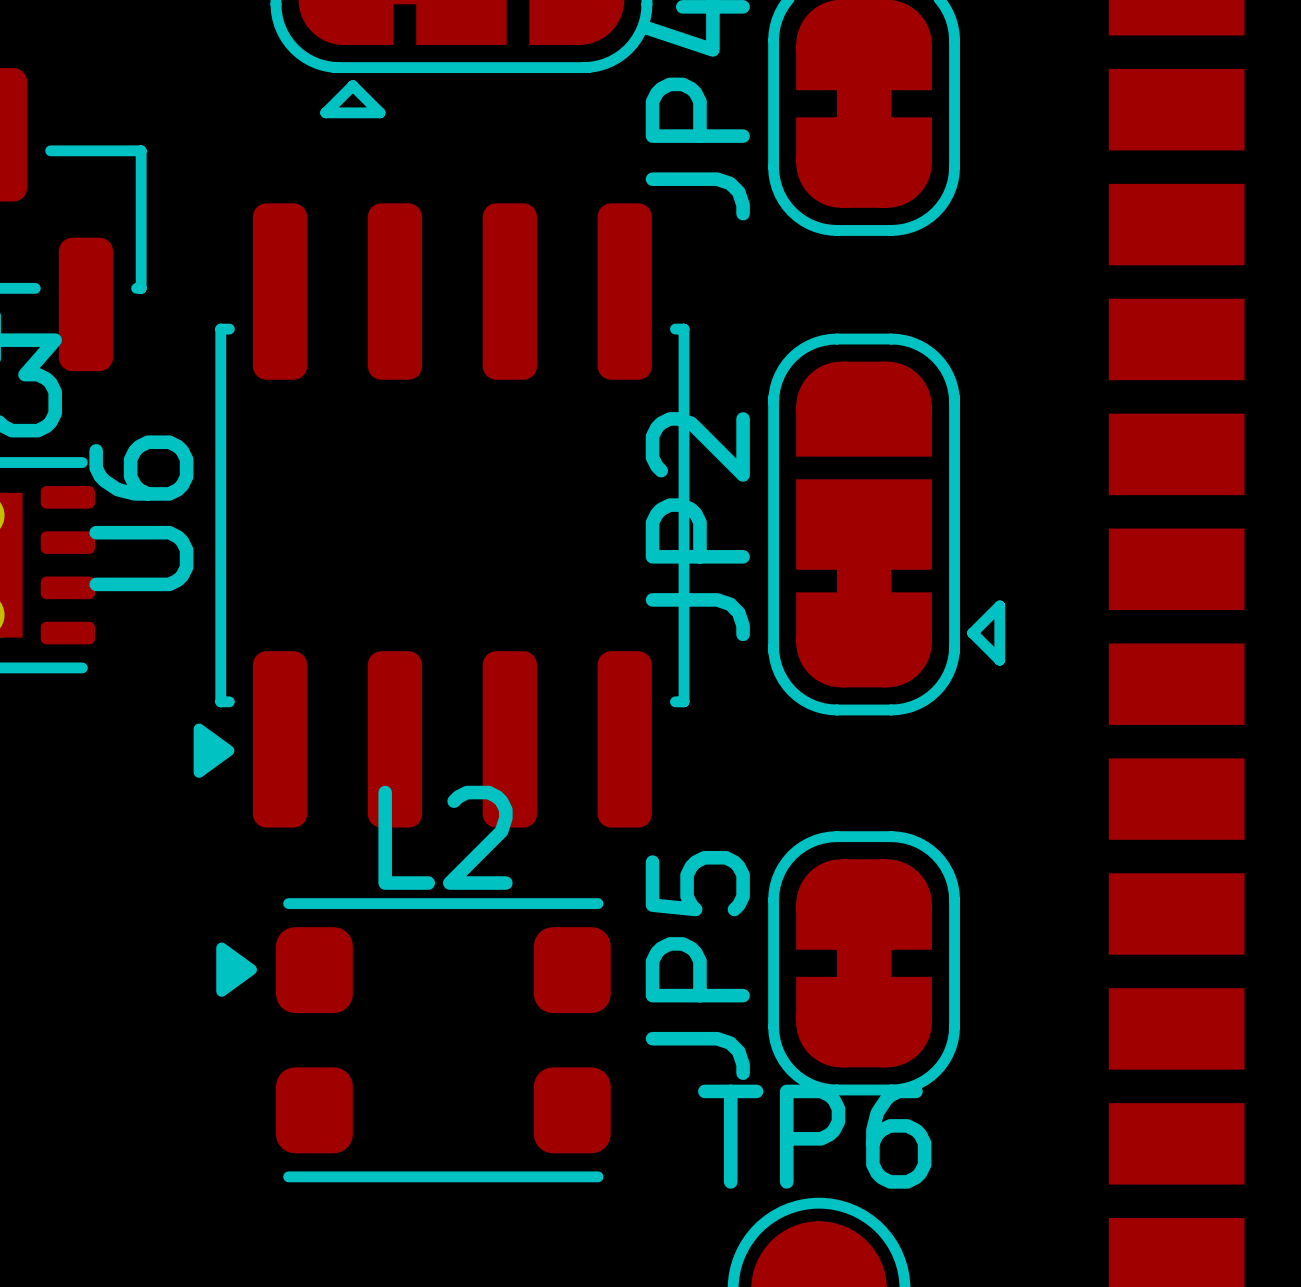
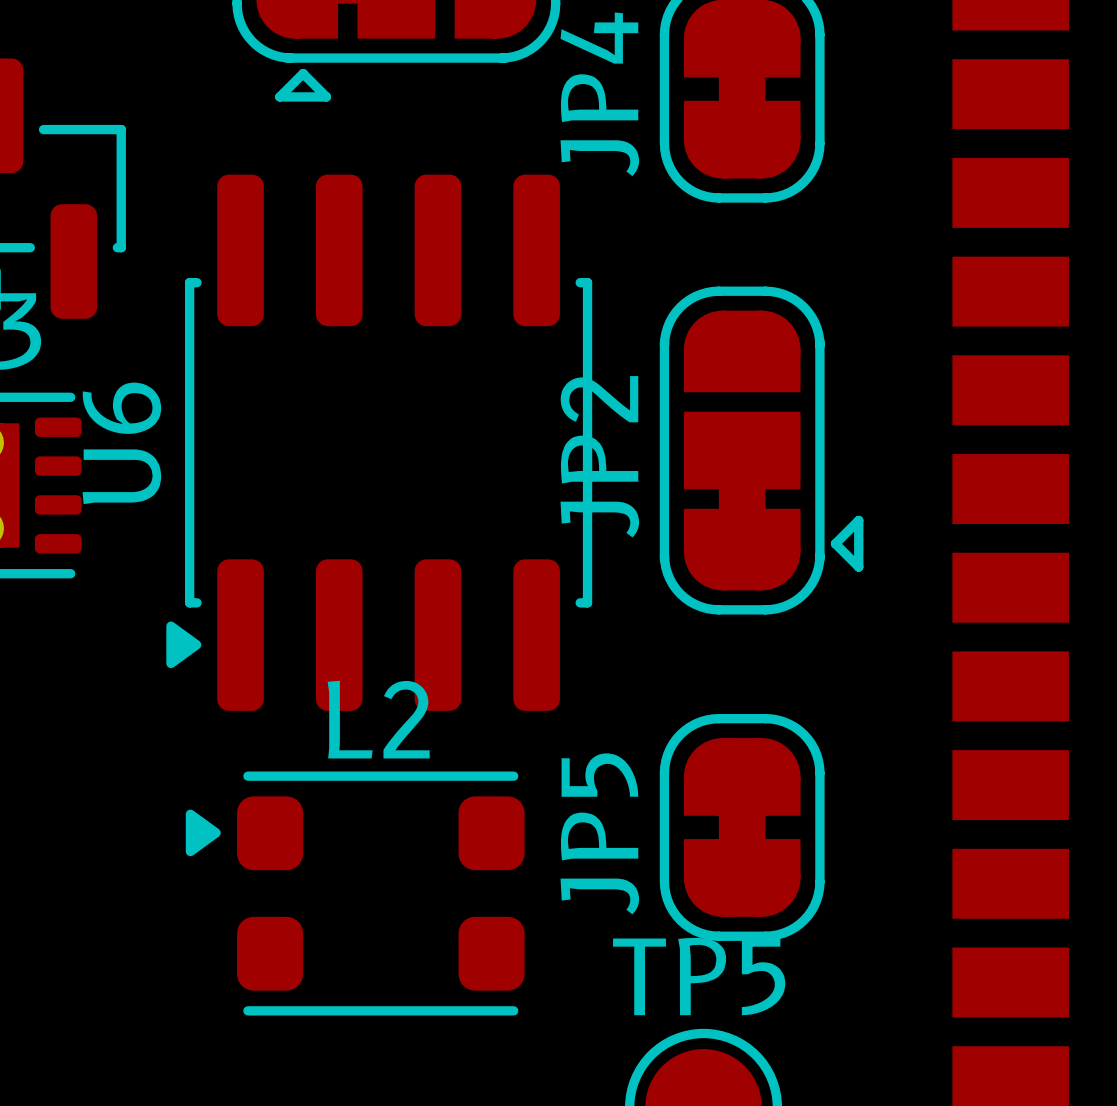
TP6 name: TP6 (814, 1136) -> TP5 (699, 976)

